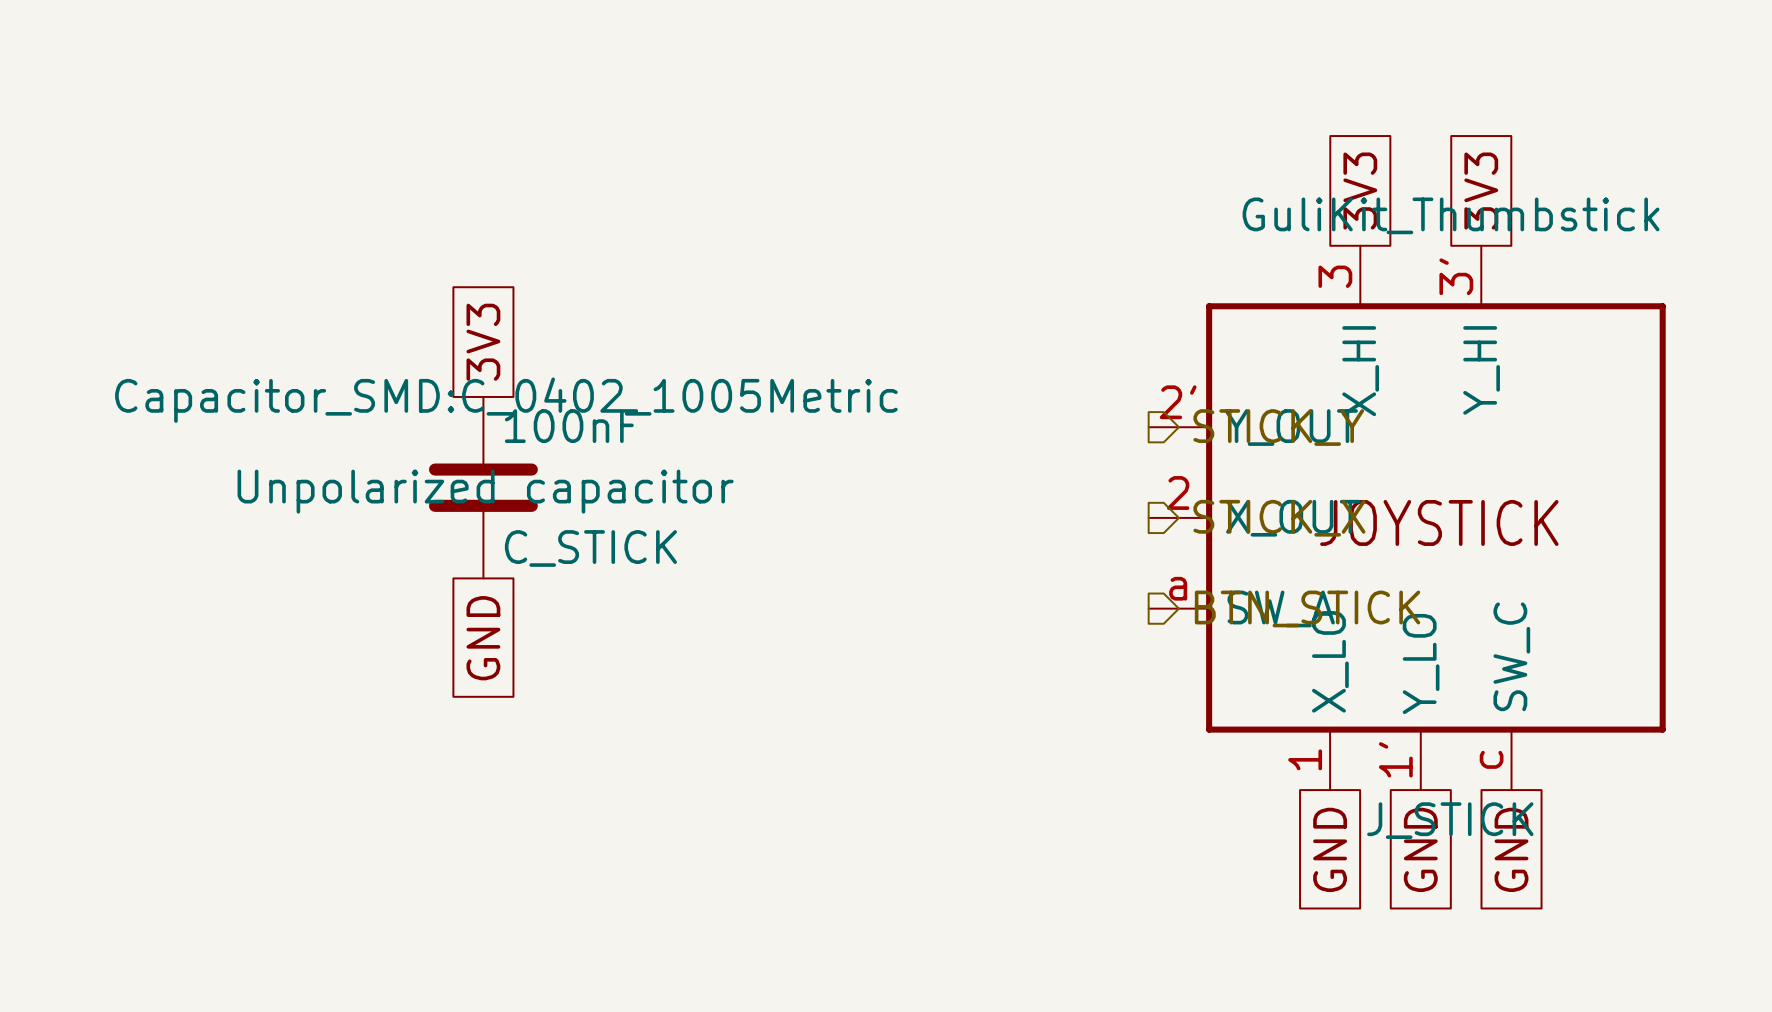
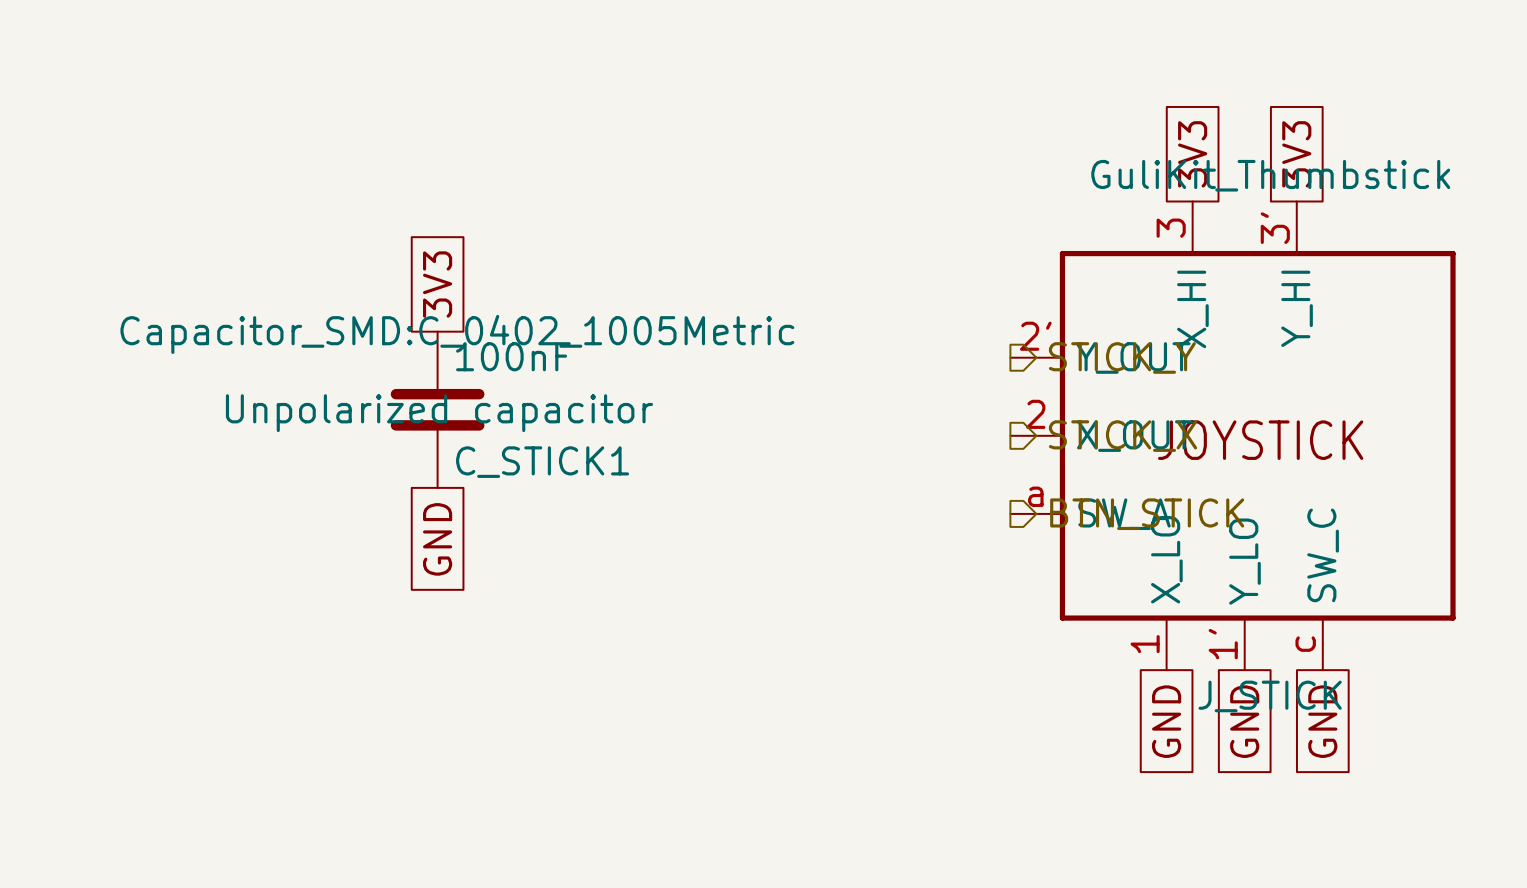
C_STICK name: C_STICK (590, 548) -> C_STICK1 (542, 462)

